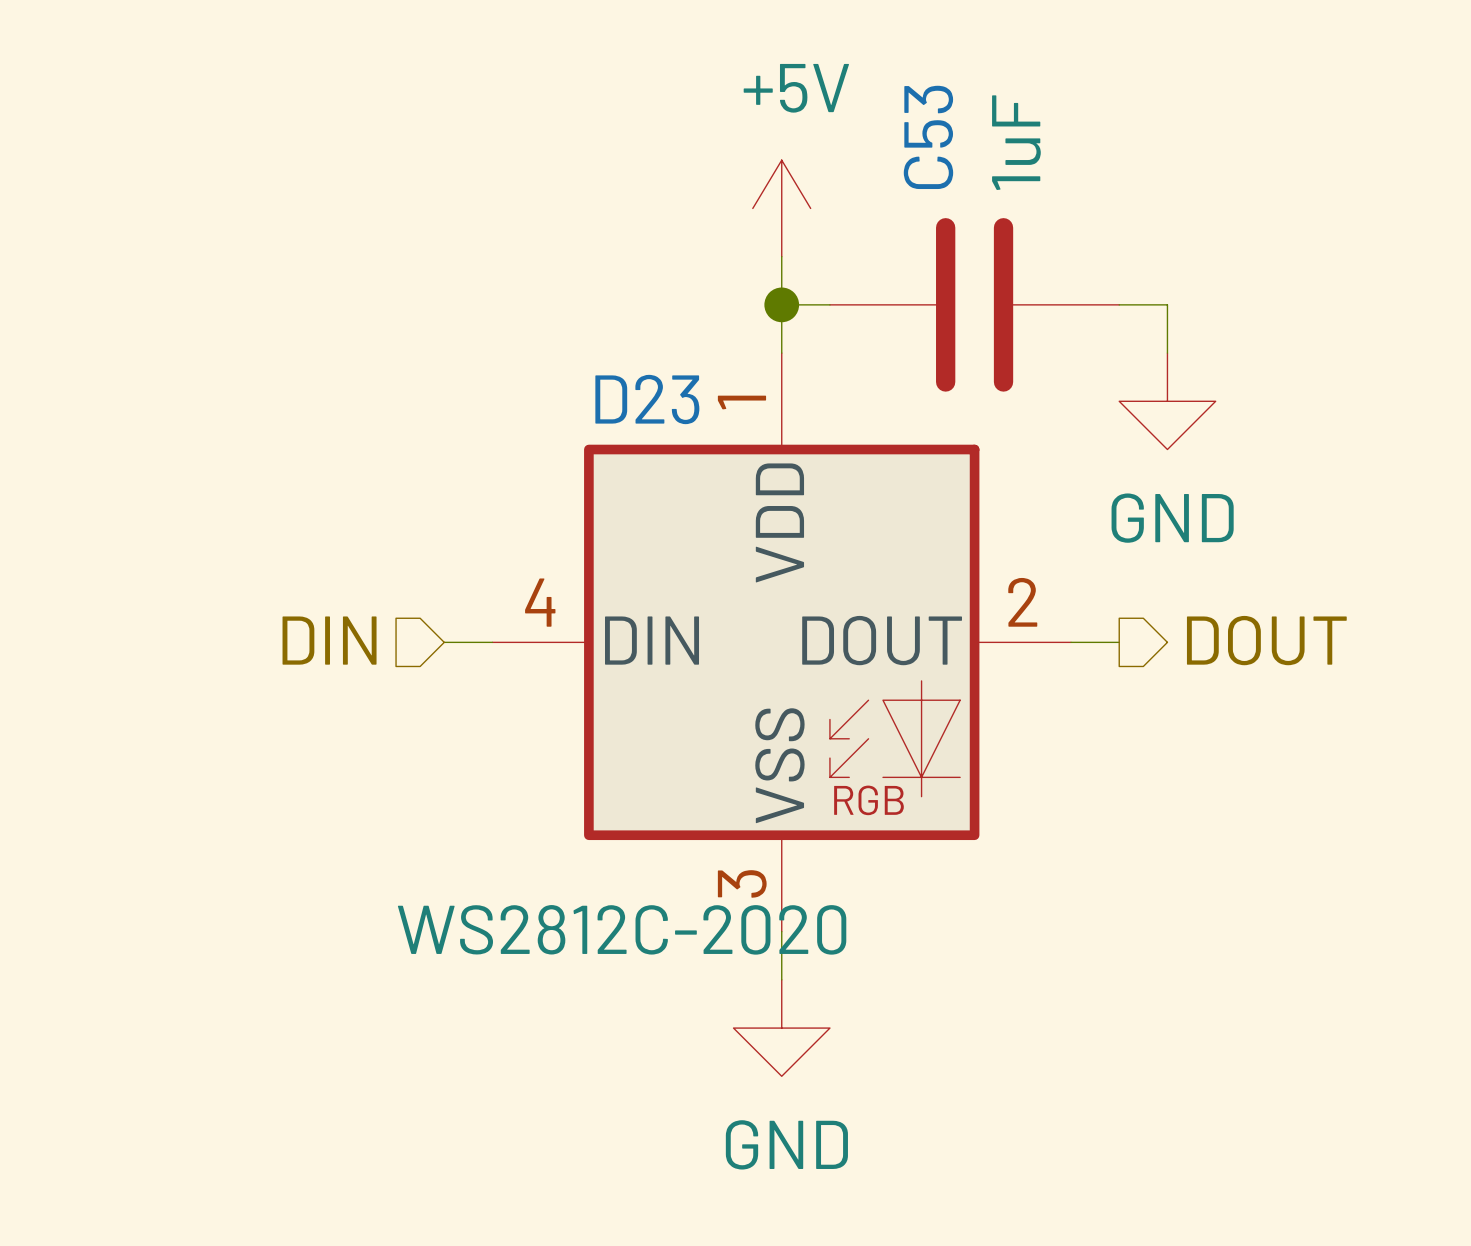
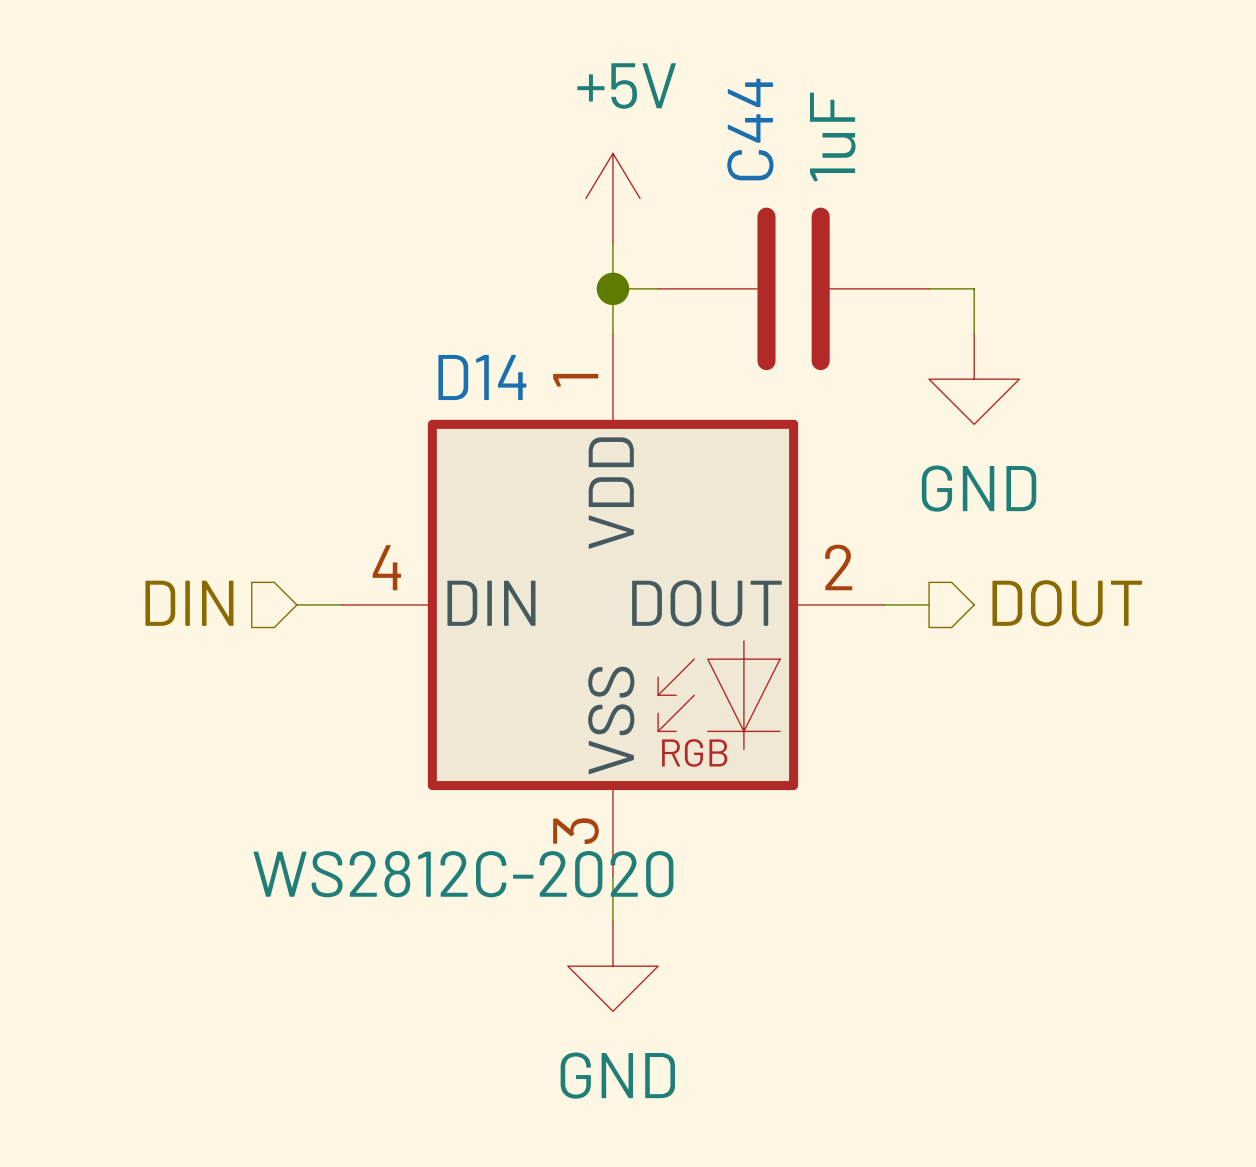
C53 name: C53 (928, 137) -> C44 (750, 129)
D23 name: D23 (647, 399) -> D14 (482, 377)

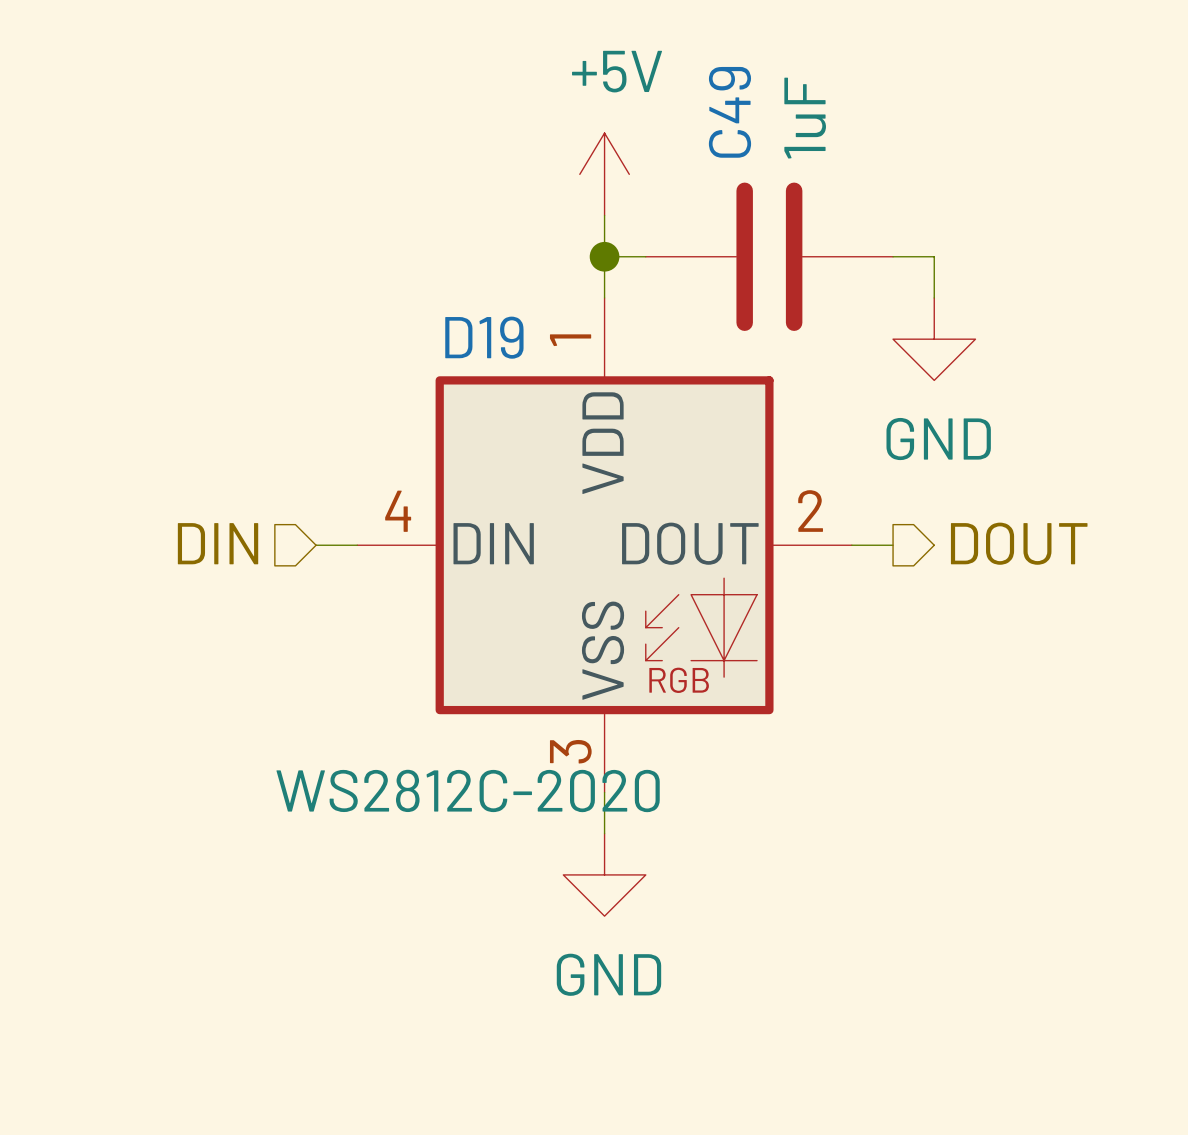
C44 name: C44 (750, 129) -> C49 (729, 112)
D14 name: D14 (482, 377) -> D19 (484, 337)

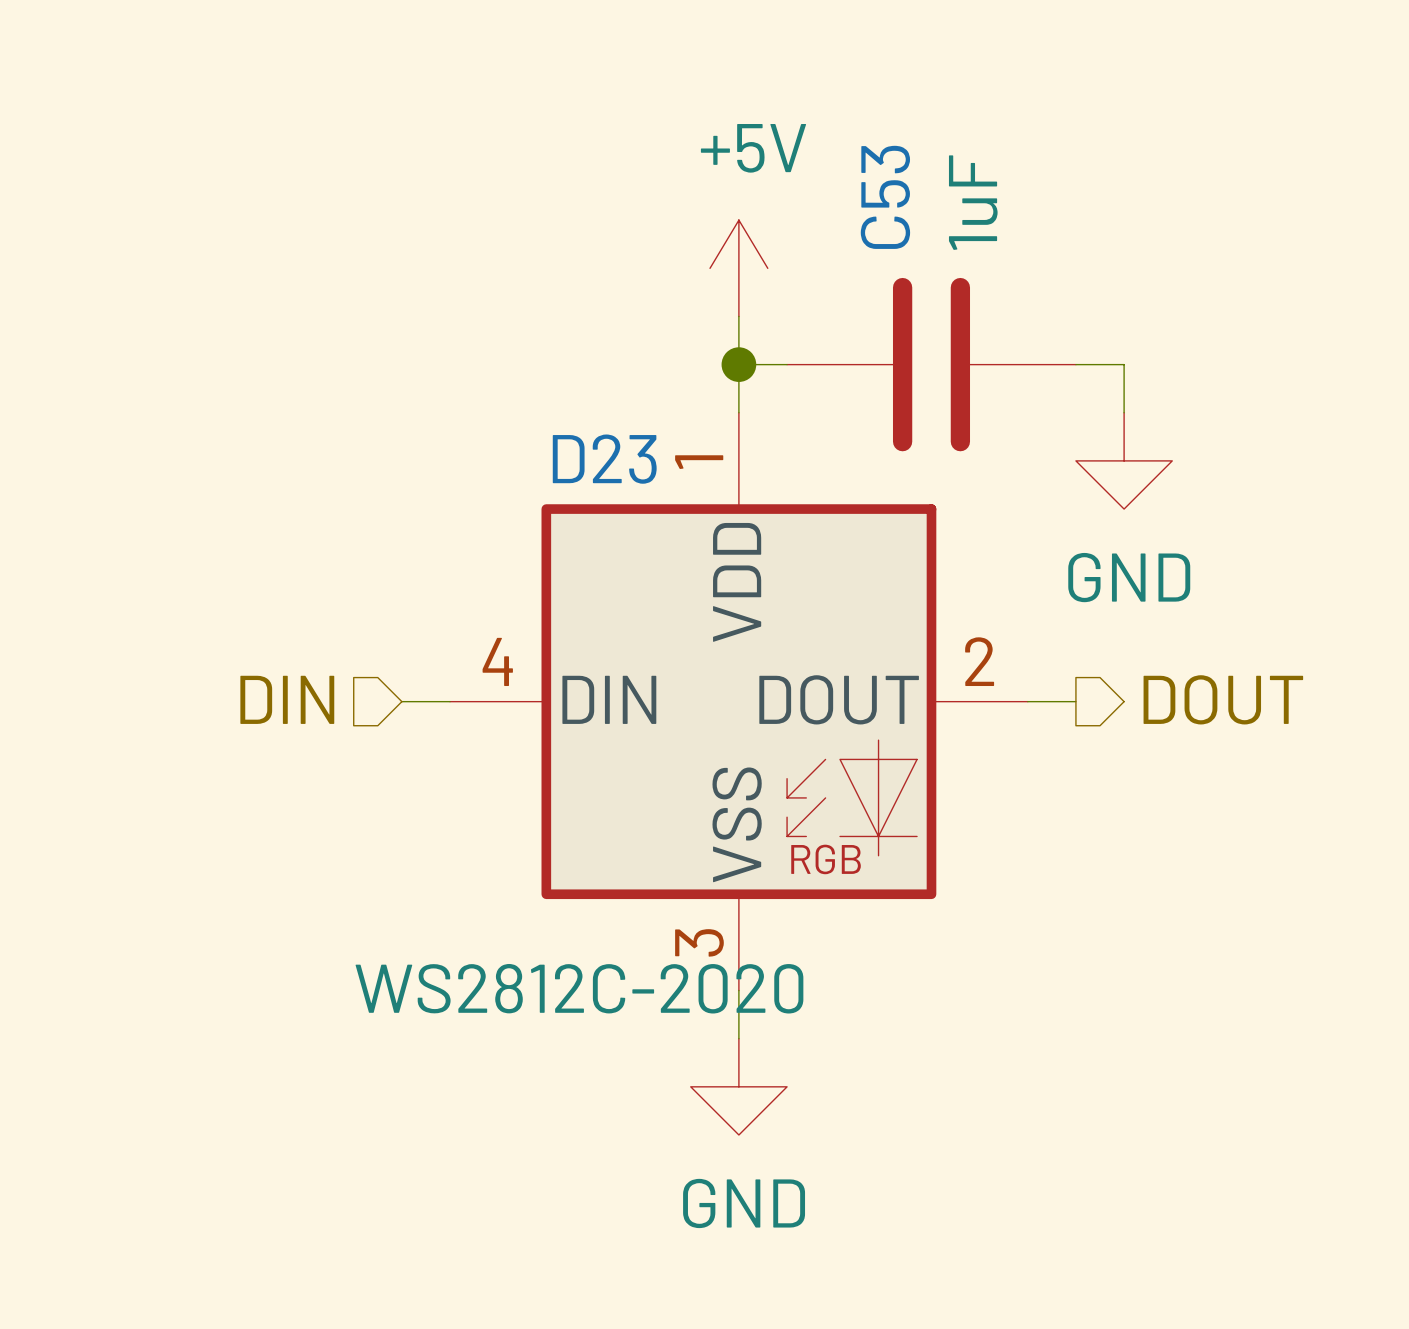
C49 name: C49 (729, 112) -> C53 (885, 197)
D19 name: D19 (484, 337) -> D23 (604, 459)

